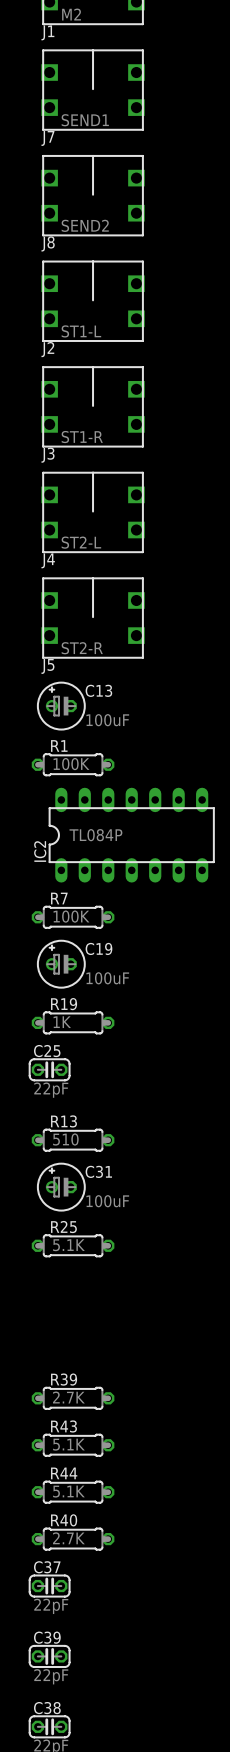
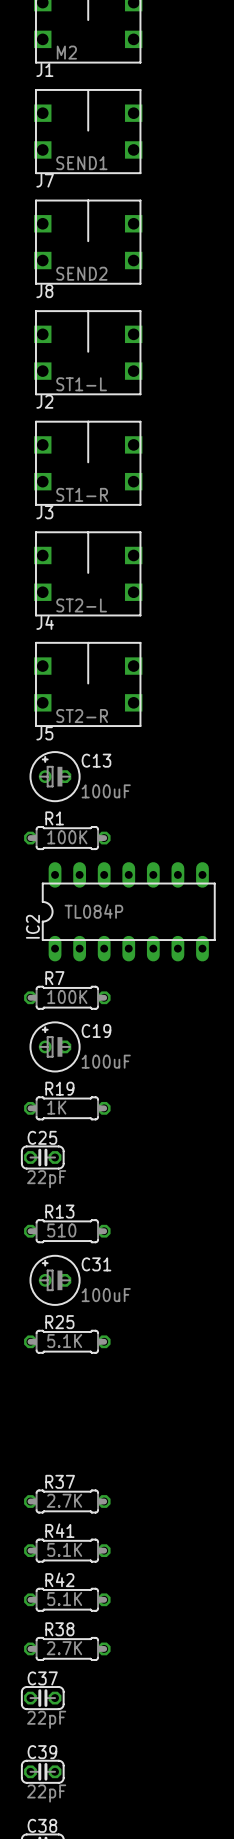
R39 name: R39 (64, 1379) -> R37 (60, 1481)
R43 name: R43 (63, 1426) -> R41 (59, 1530)
R44 name: R44 (64, 1473) -> R42 (59, 1579)
R40 name: R40 (64, 1520) -> R38 (59, 1629)

